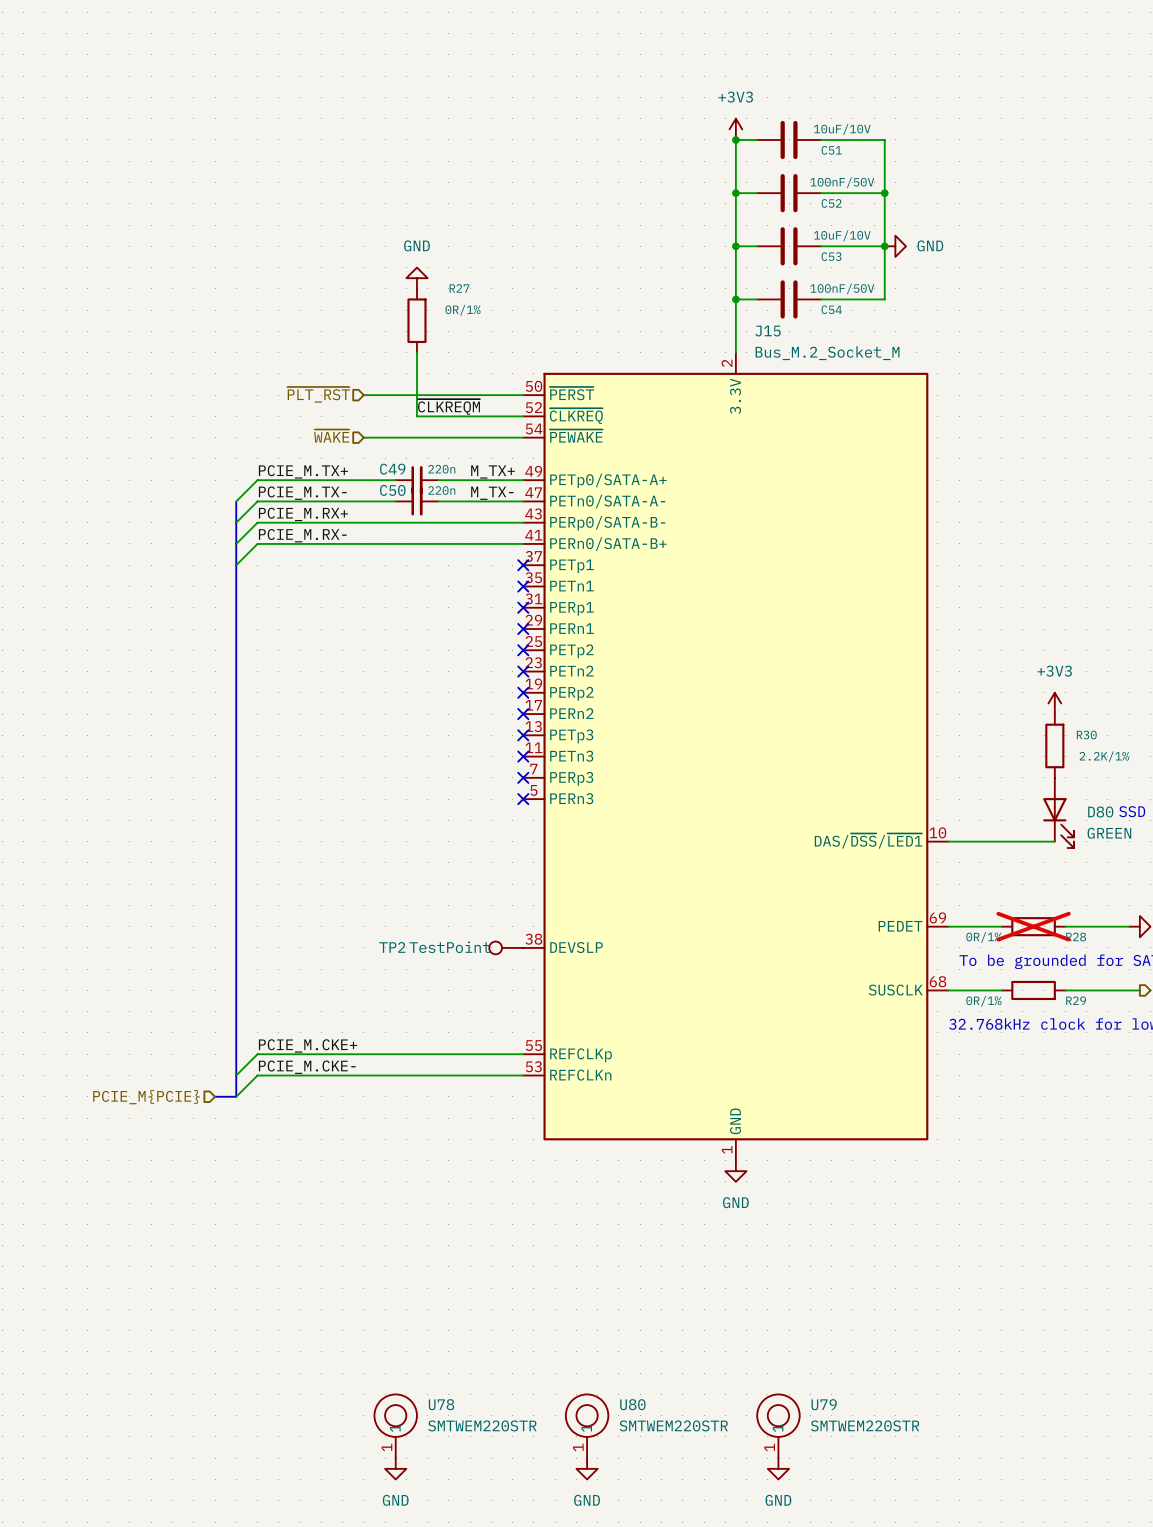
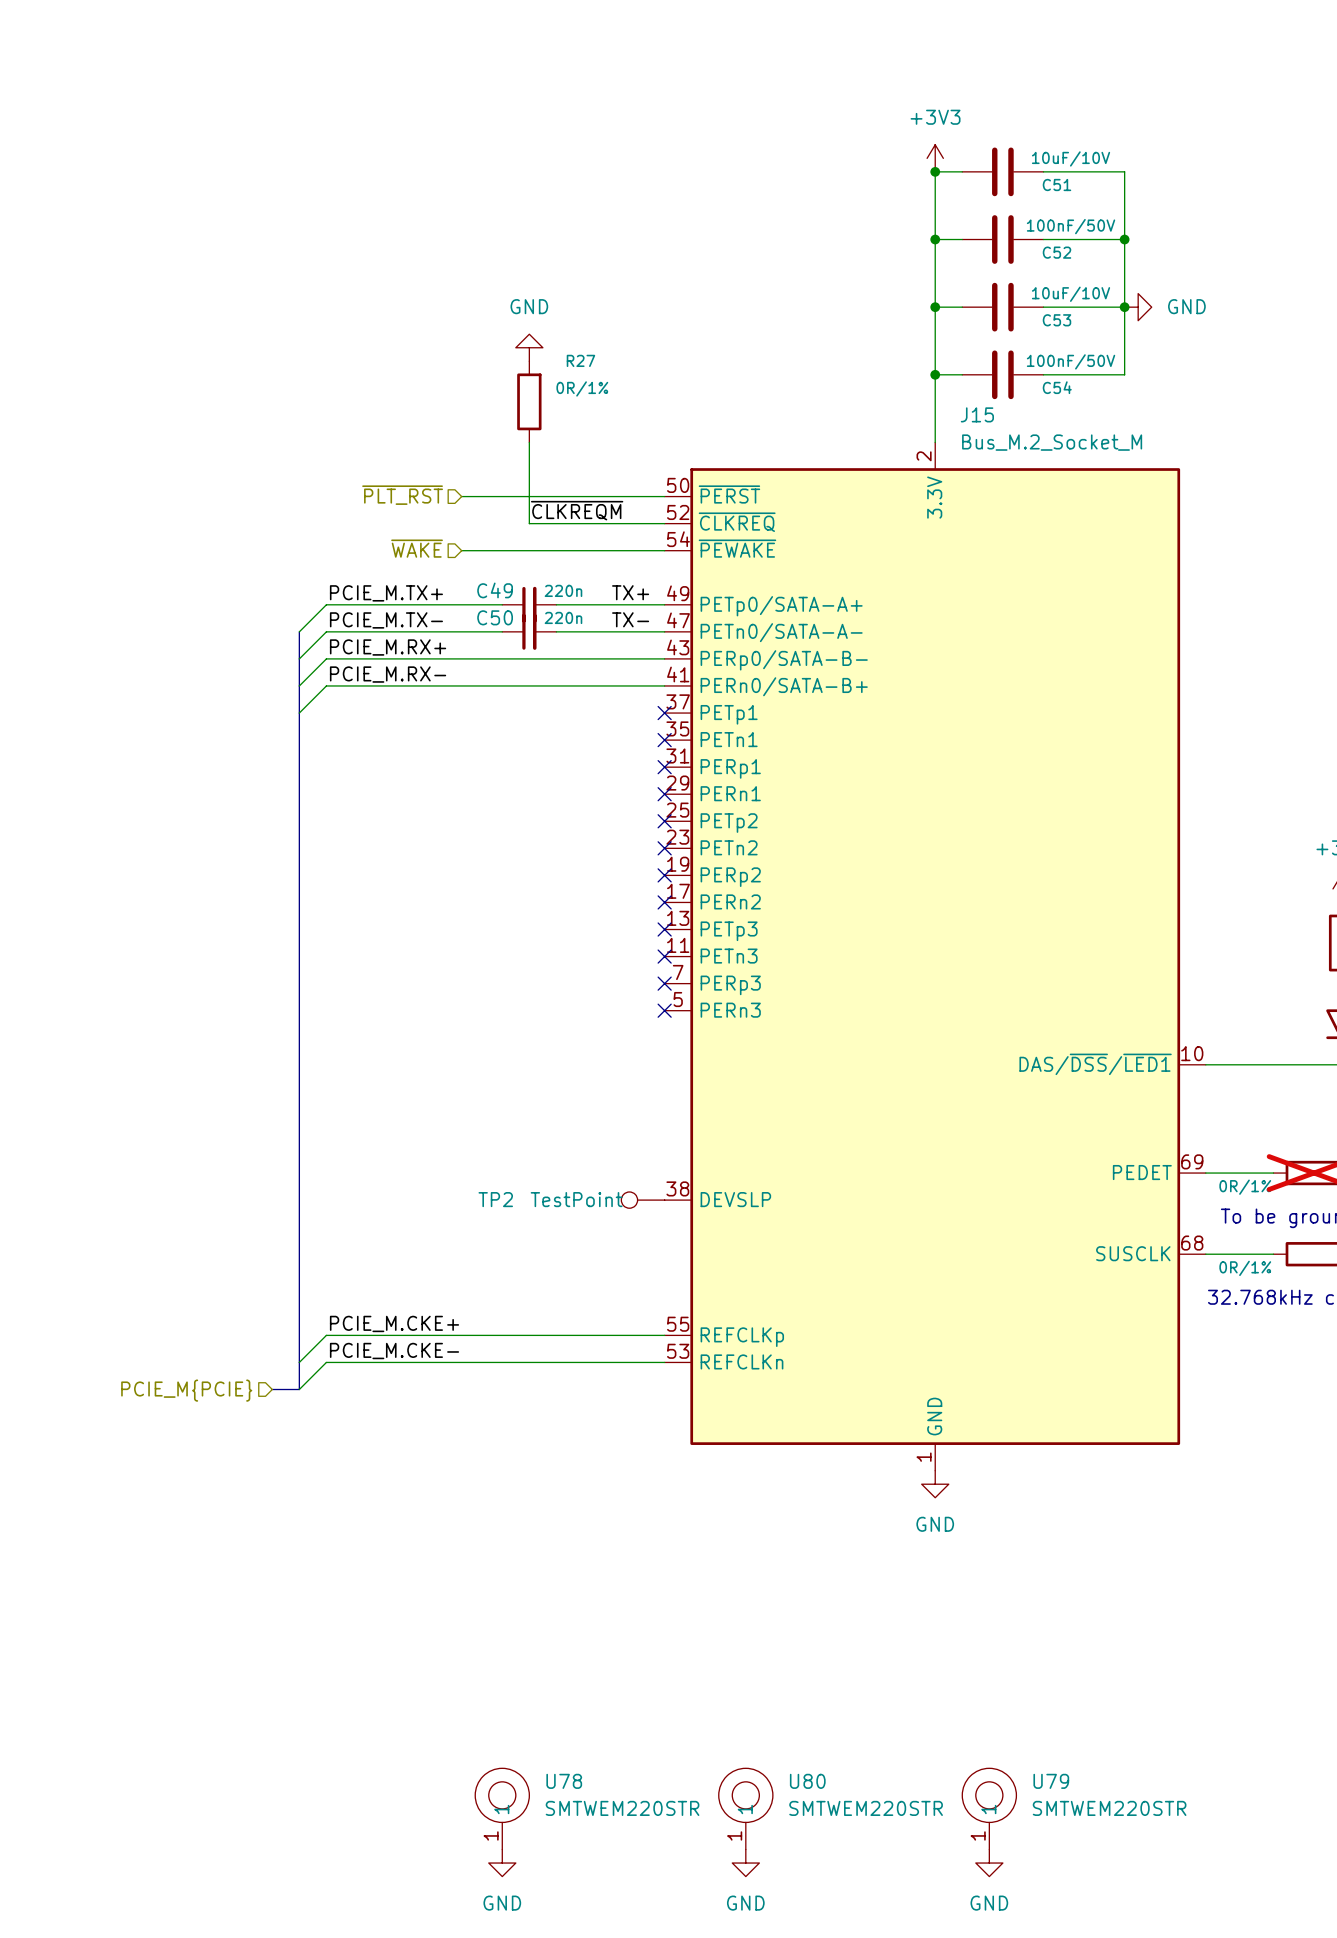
label: M_TX+ (493, 471) -> TX+ (630, 592)
label: M_TX- (492, 493) -> TX- (630, 619)

